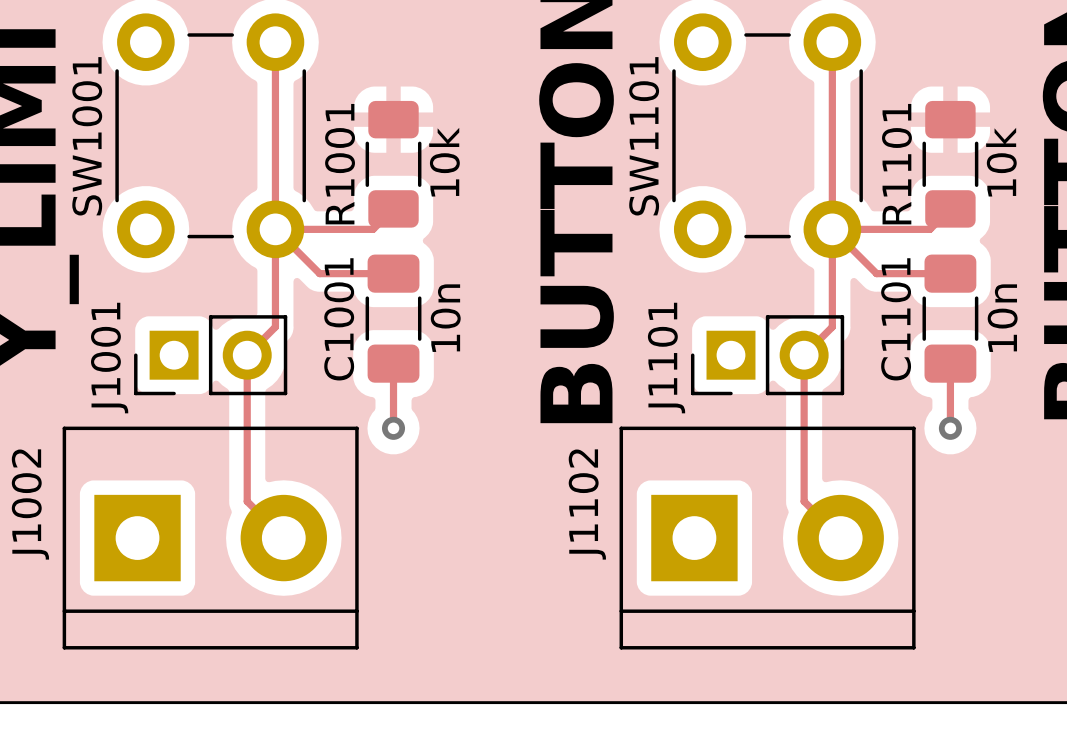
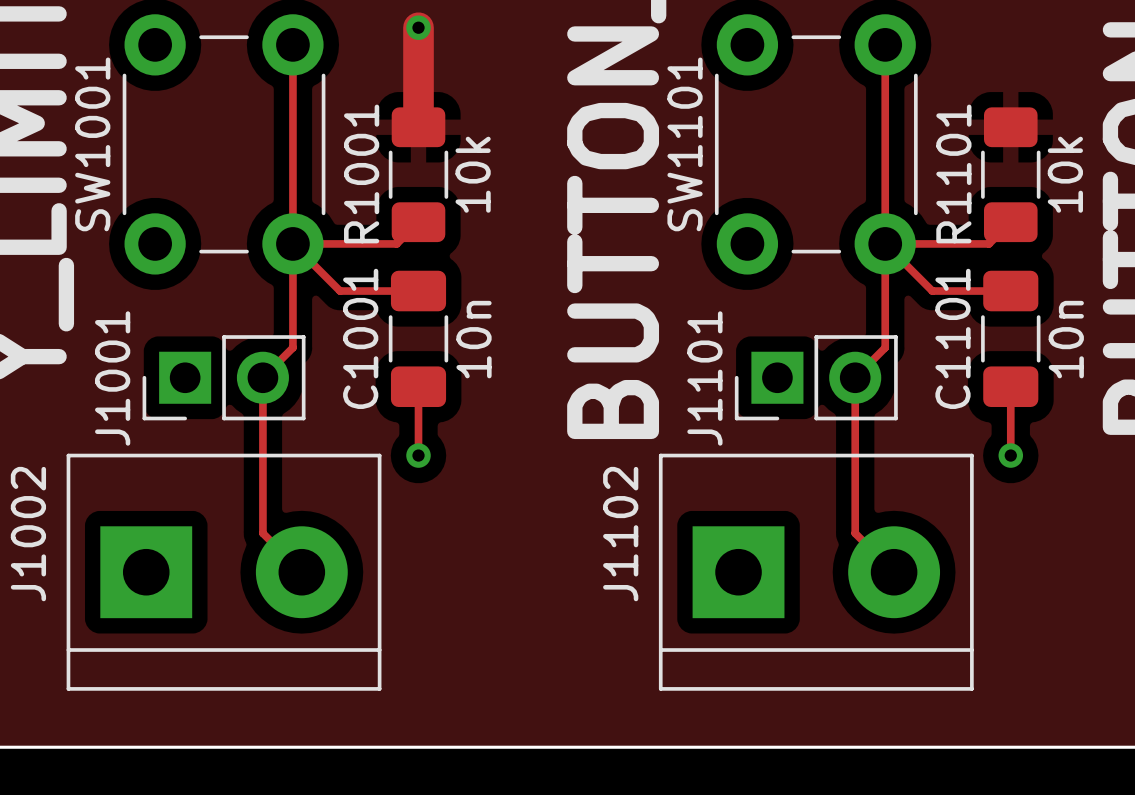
track: none -> (418, 27) (418, 127)
via: none -> (418, 27)

